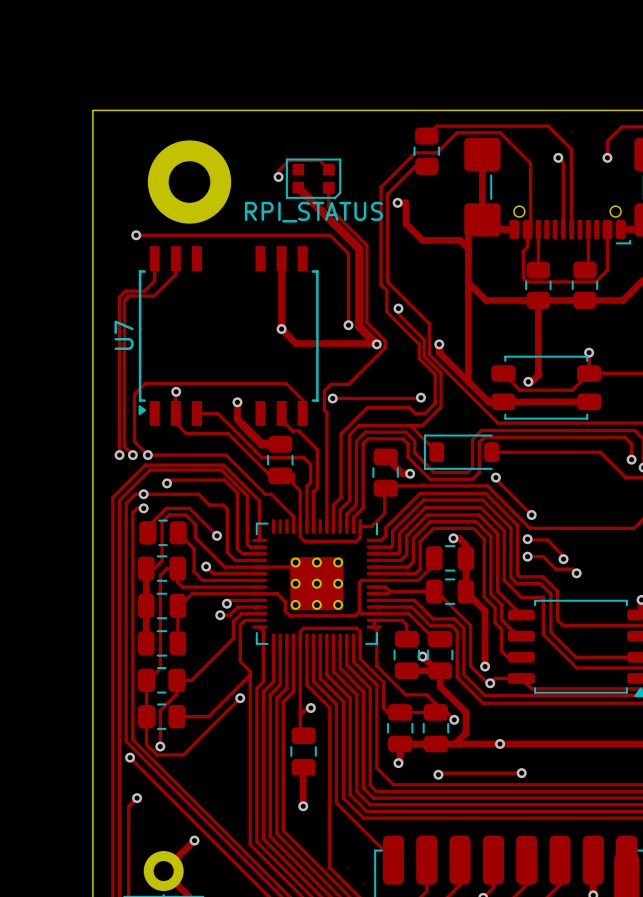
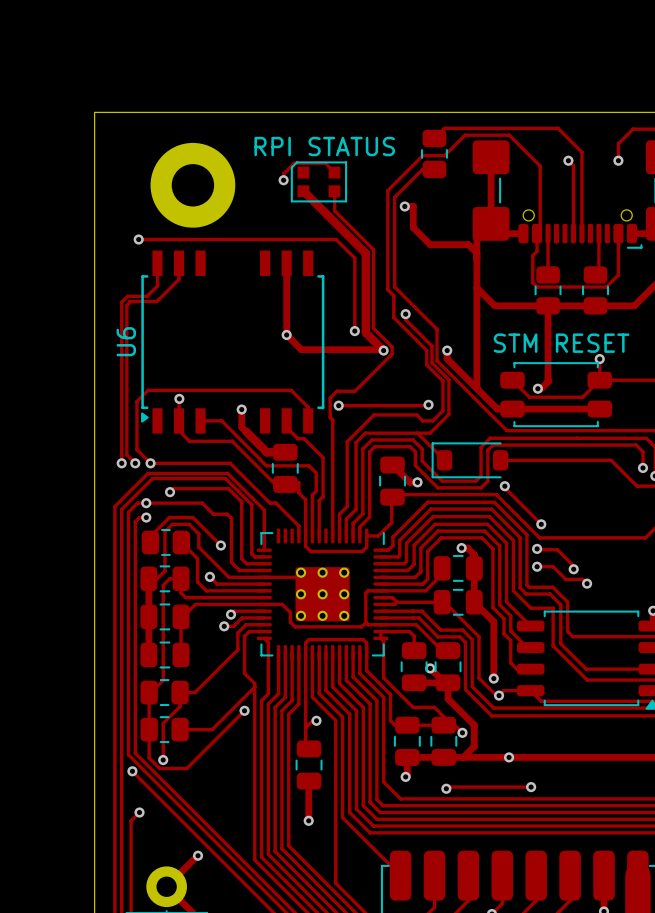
text: none -> RPI STATUS (324, 146)
RPI_STATUS: (313, 178) -> none
part: none -> (318, 181)
U7 name: U7 (124, 335) -> U6 (126, 341)
text: none -> STM RESET (561, 343)

